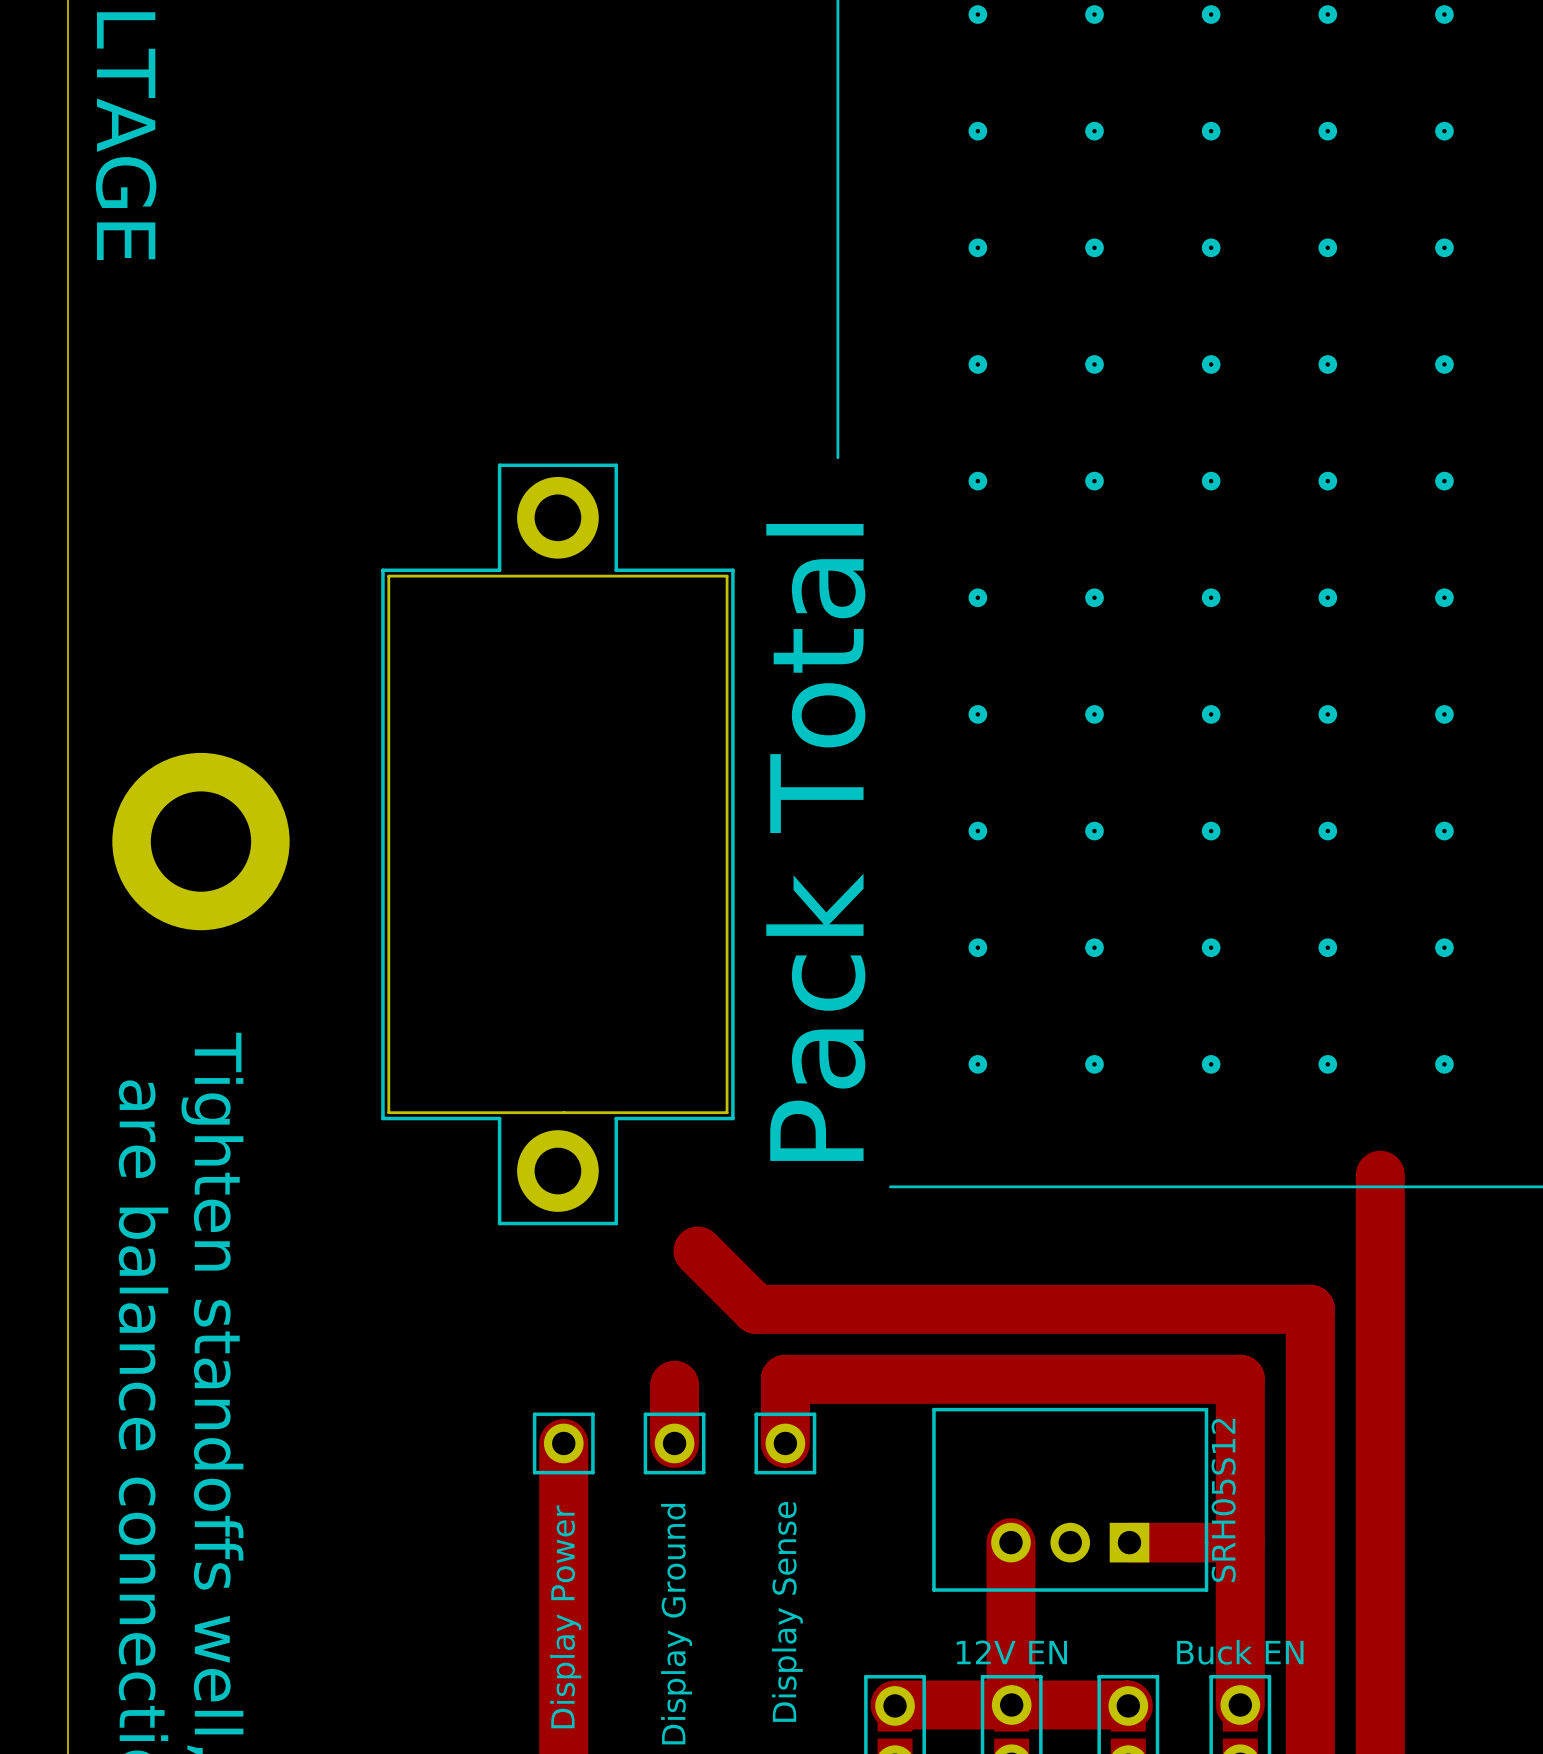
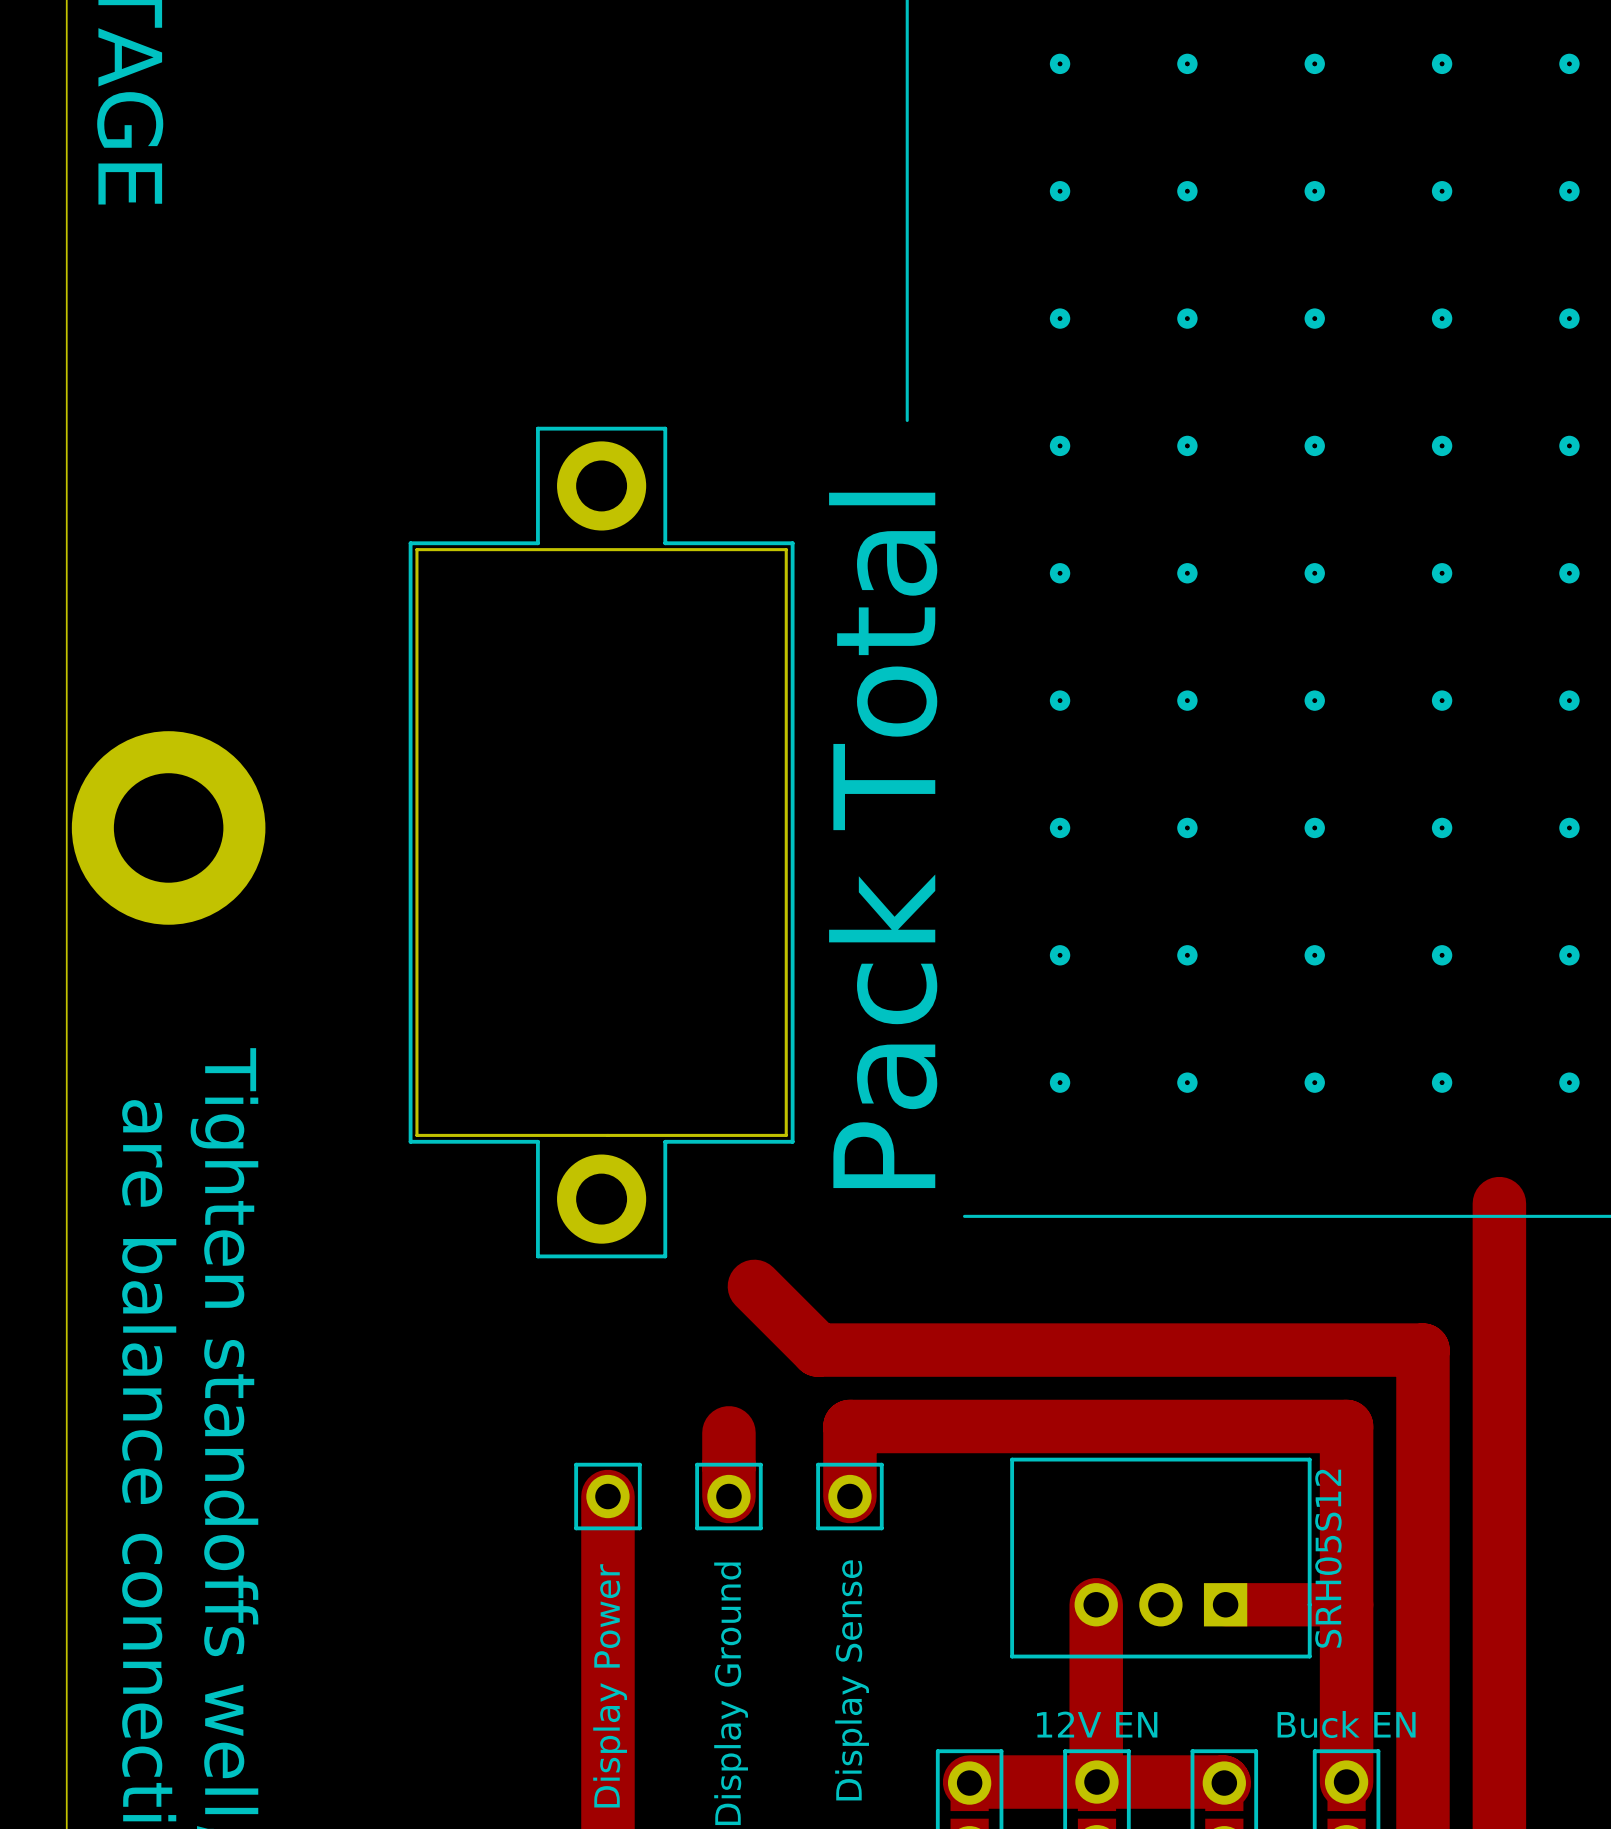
part position: (200, 841) -> (168, 827)

